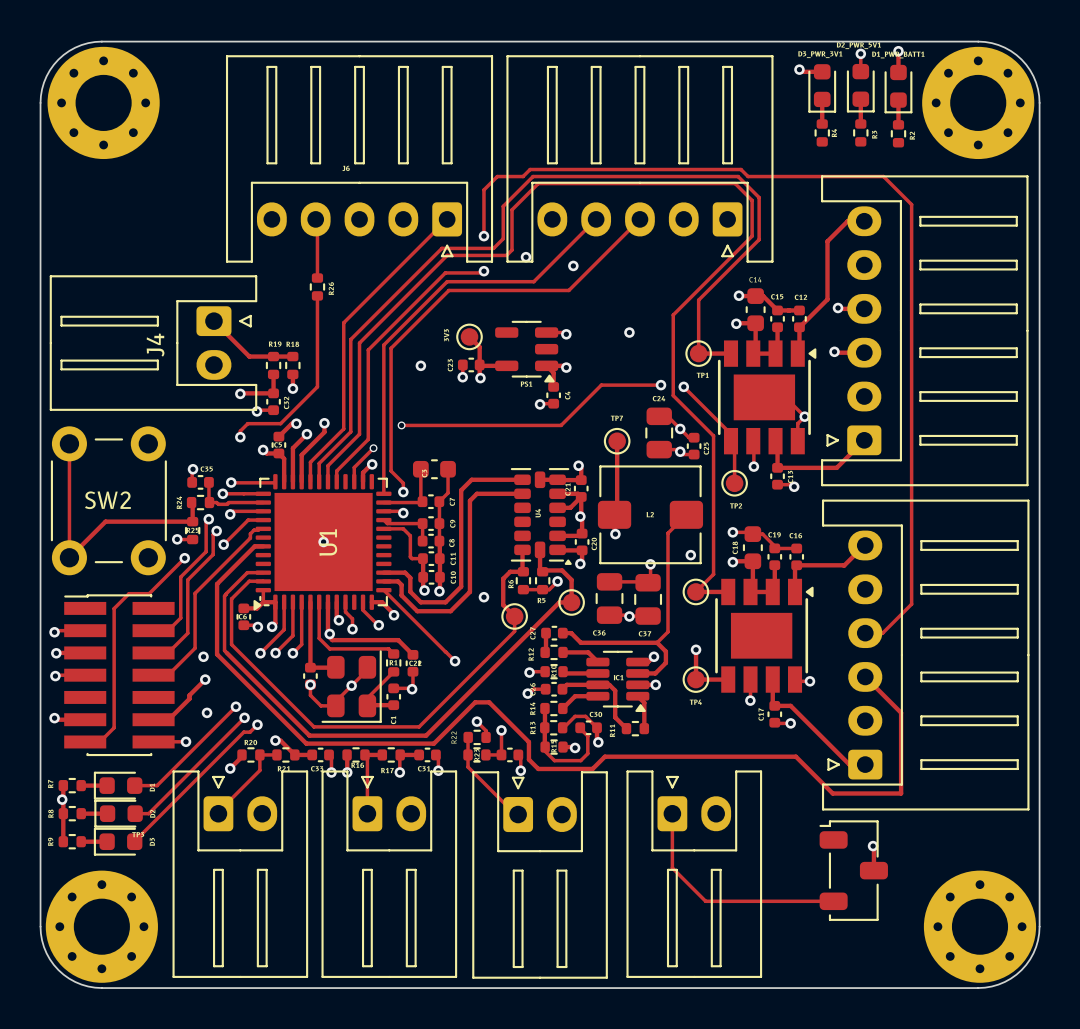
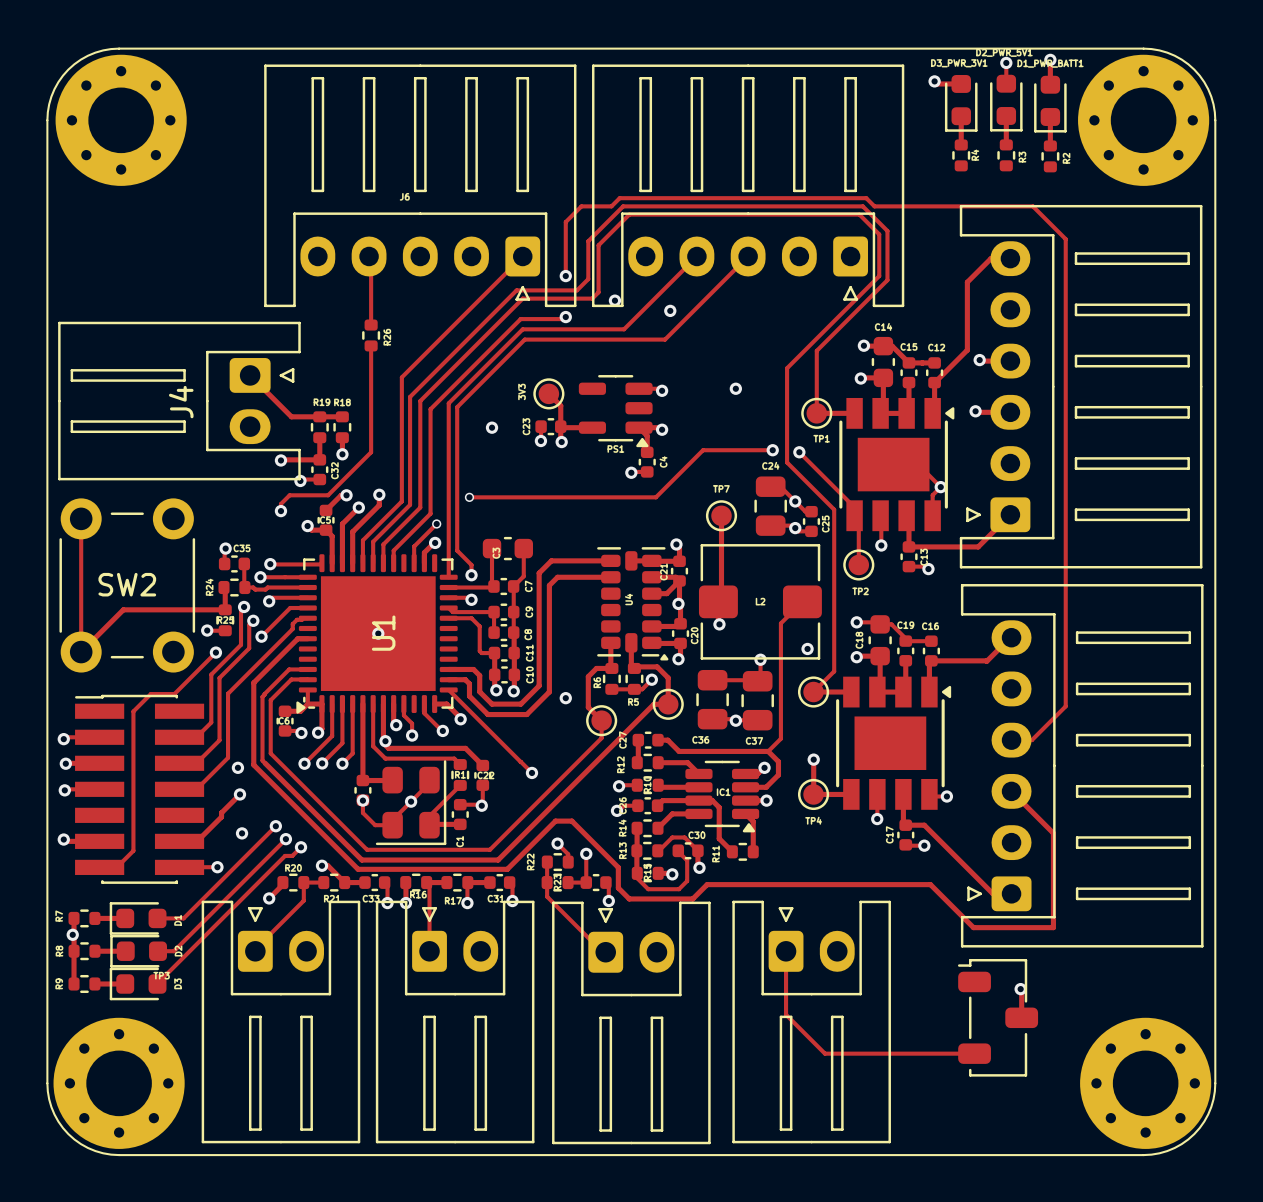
board edge: (101, 41) (978, 41) (998, 45) (1010, 50) (1021, 59) (1033, 76) (1038, 89) (1039, 102) (1039, 926) (1036, 946) (1030, 959) (1021, 970) (1010, 978) (998, 984) (978, 988) (101, 988) (81, 984) (69, 978) (58, 970) (46, 953) (42, 940) (40, 926) (40, 102) (43, 82) (49, 70) (58, 59) (75, 47) (88, 43) (101, 41) -> none
line: none -> (119, 48) (1143, 48) (1167, 52) (1181, 59) (1194, 69) (1208, 89) (1213, 104) (1215, 120) (1215, 1083) (1211, 1107) (1204, 1121) (1194, 1134) (1181, 1144) (1167, 1151) (1143, 1155) (119, 1155) (95, 1151) (80, 1144) (68, 1134) (54, 1114) (49, 1099) (47, 1083) (47, 120) (51, 96) (58, 82) (68, 69) (87, 55) (103, 50) (119, 48)

